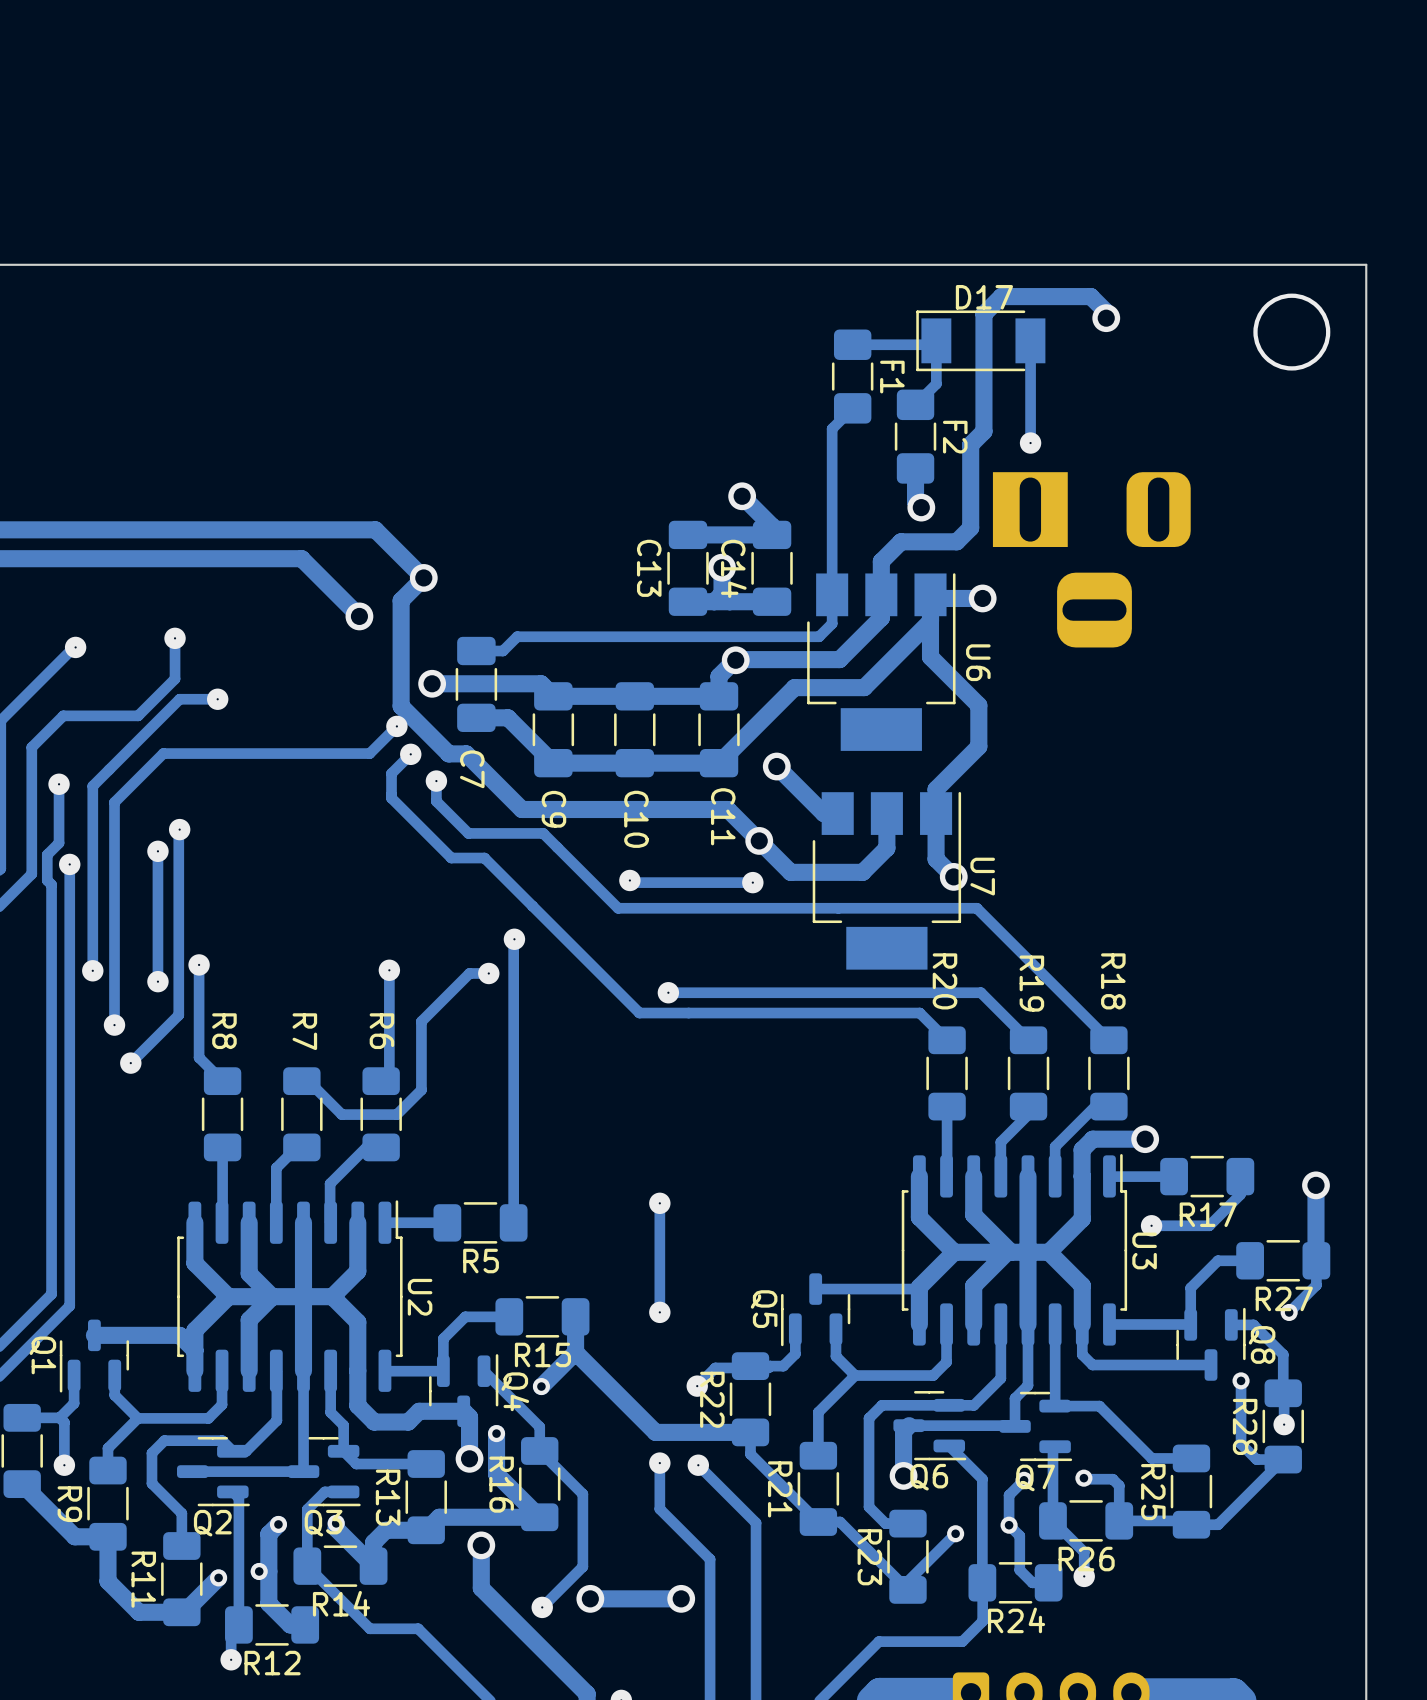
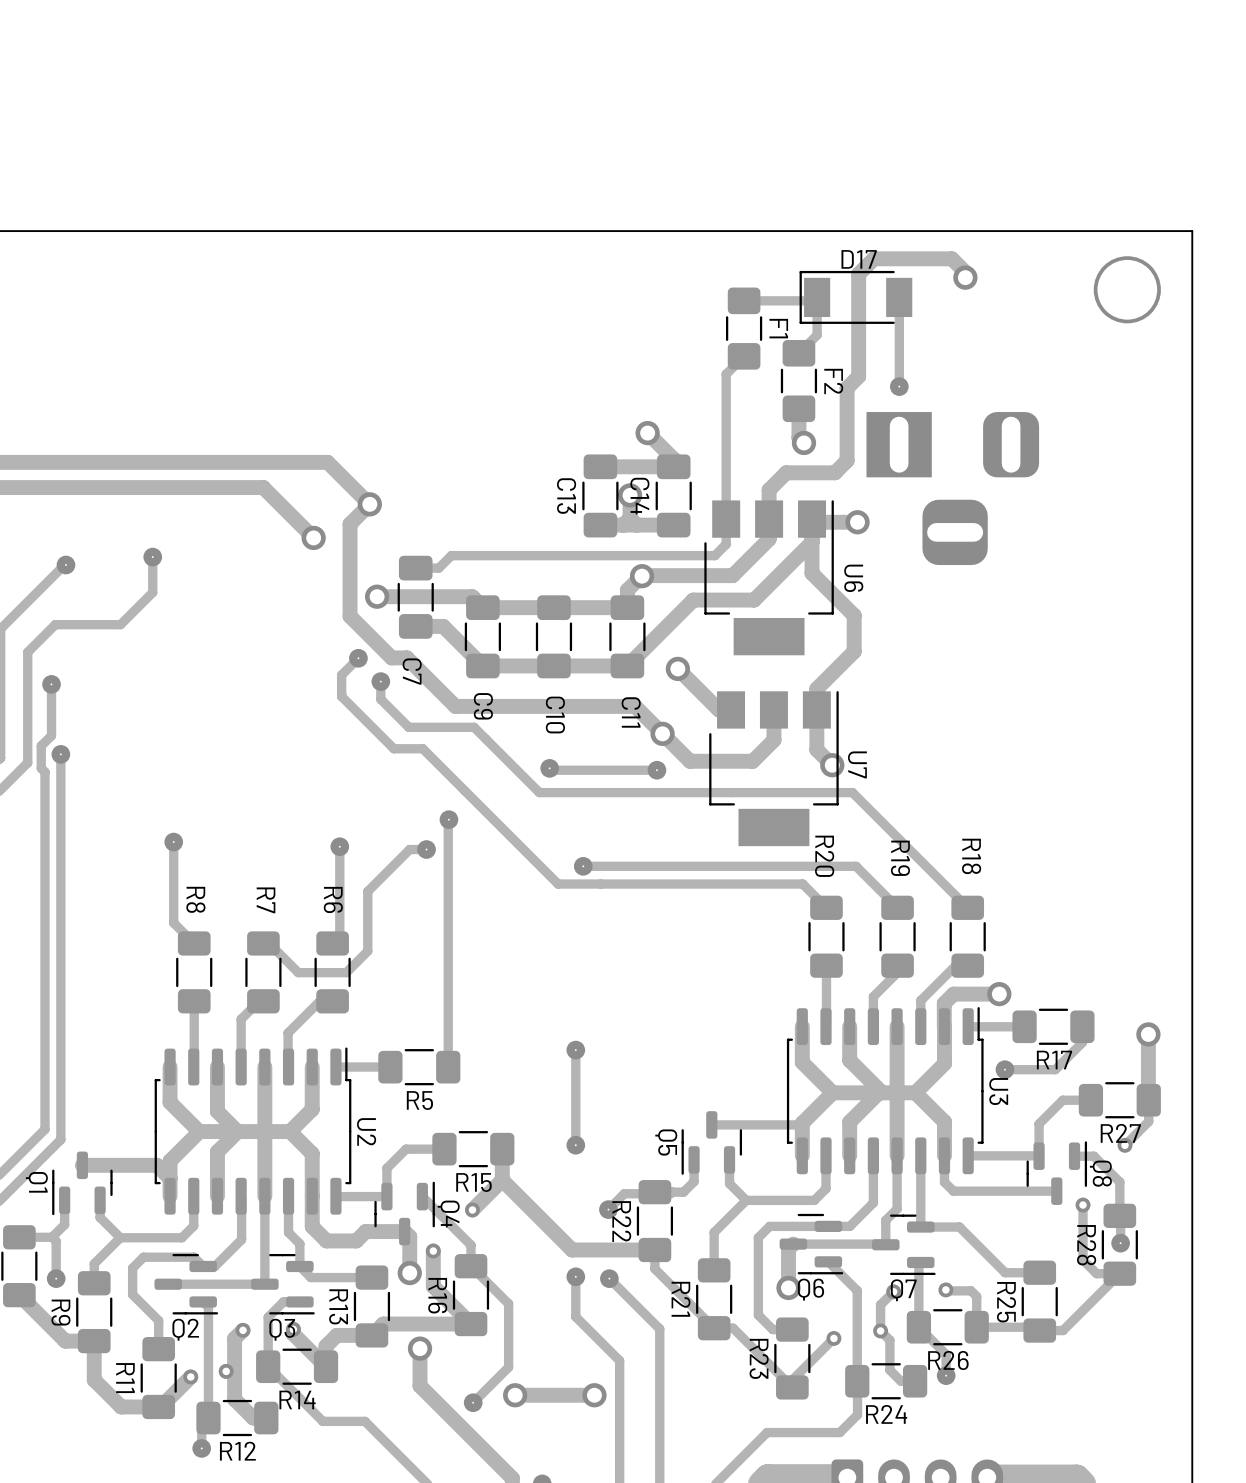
track: (217, 699) (179, 699) (92, 786) (92, 970) -> none
via: (217, 699) -> none
via: (396, 726) -> none
track: (396, 727) (369, 753) (163, 753) (114, 802) (114, 1025) -> none
track: (179, 829) (178, 1015) (130, 1063) -> none
via: (179, 829) -> none
track: (157, 851) (157, 981) -> none
via: (157, 851) -> none
via: (92, 970) -> none
via: (157, 981) -> none
via: (114, 1025) -> none
via: (130, 1063) -> none

